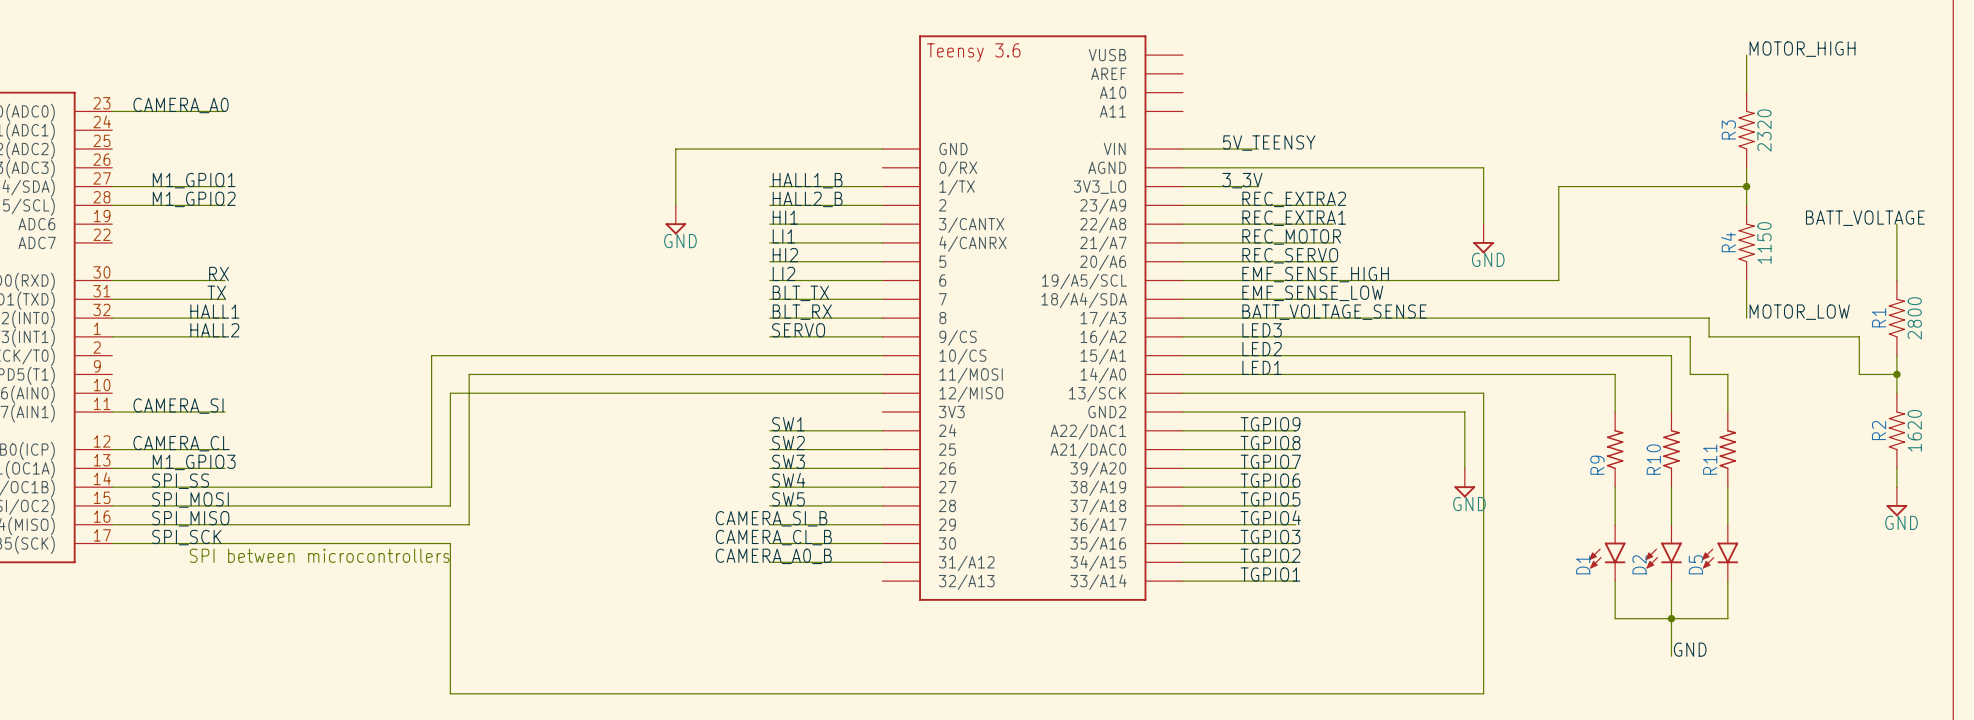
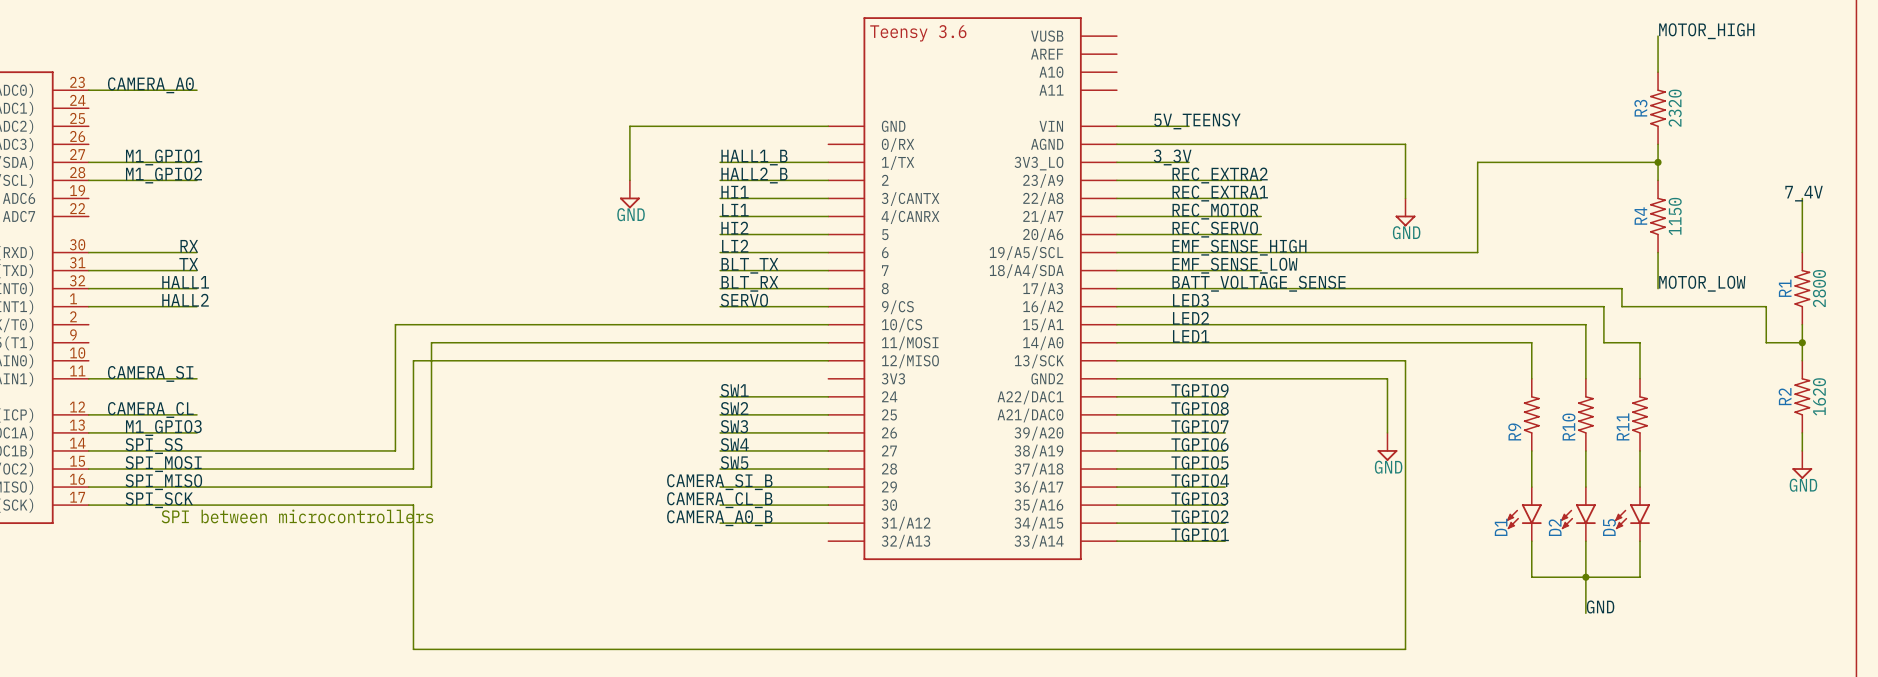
label: none -> 7_4V (1804, 193)
label: BATT_VOLTAGE (1865, 218) -> none

